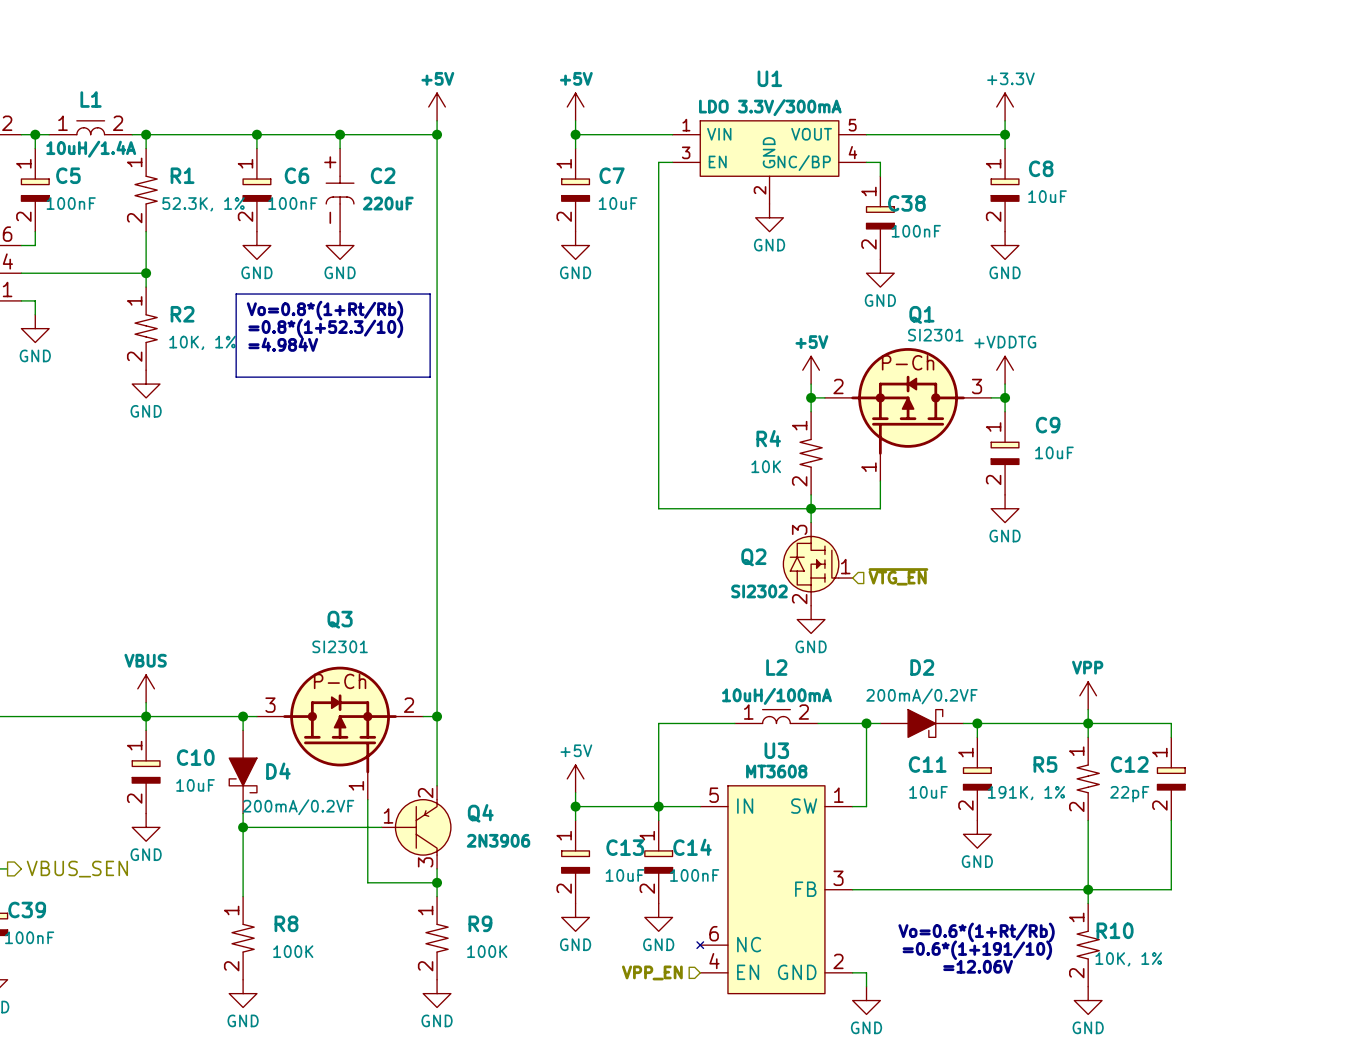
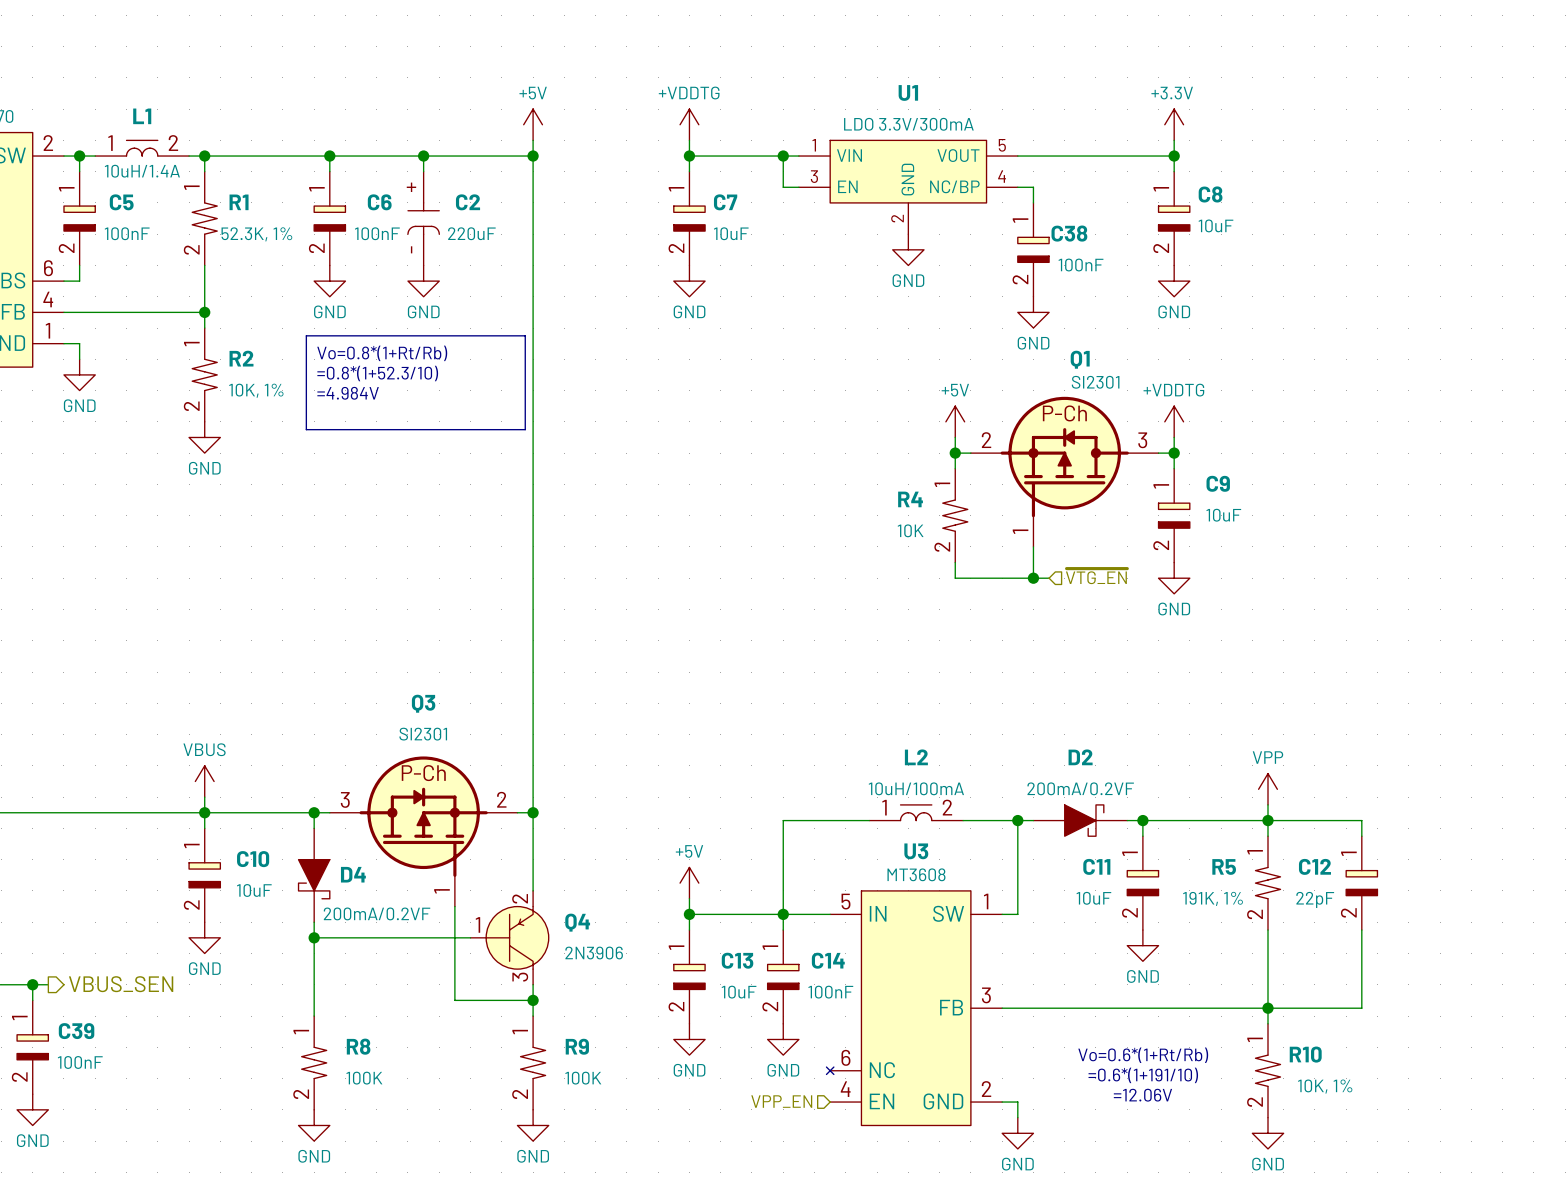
power symbol: +5V (575, 106) -> +VDDTG (689, 124)
junction: none -> (783, 156)
wire: (658, 162) (658, 508) (811, 508) (811, 522) -> (783, 187) (783, 156)
junction: (811, 508) -> none
wire: none -> (1033, 578) (1049, 578)
junction: none -> (1033, 578)
Q2: SI2302 (818, 564) -> none
hierarchical label position: ~{VTG_EN} (898, 576) -> ~{VTG_EN} (1096, 576)
power symbol: GND (811, 619) -> none

